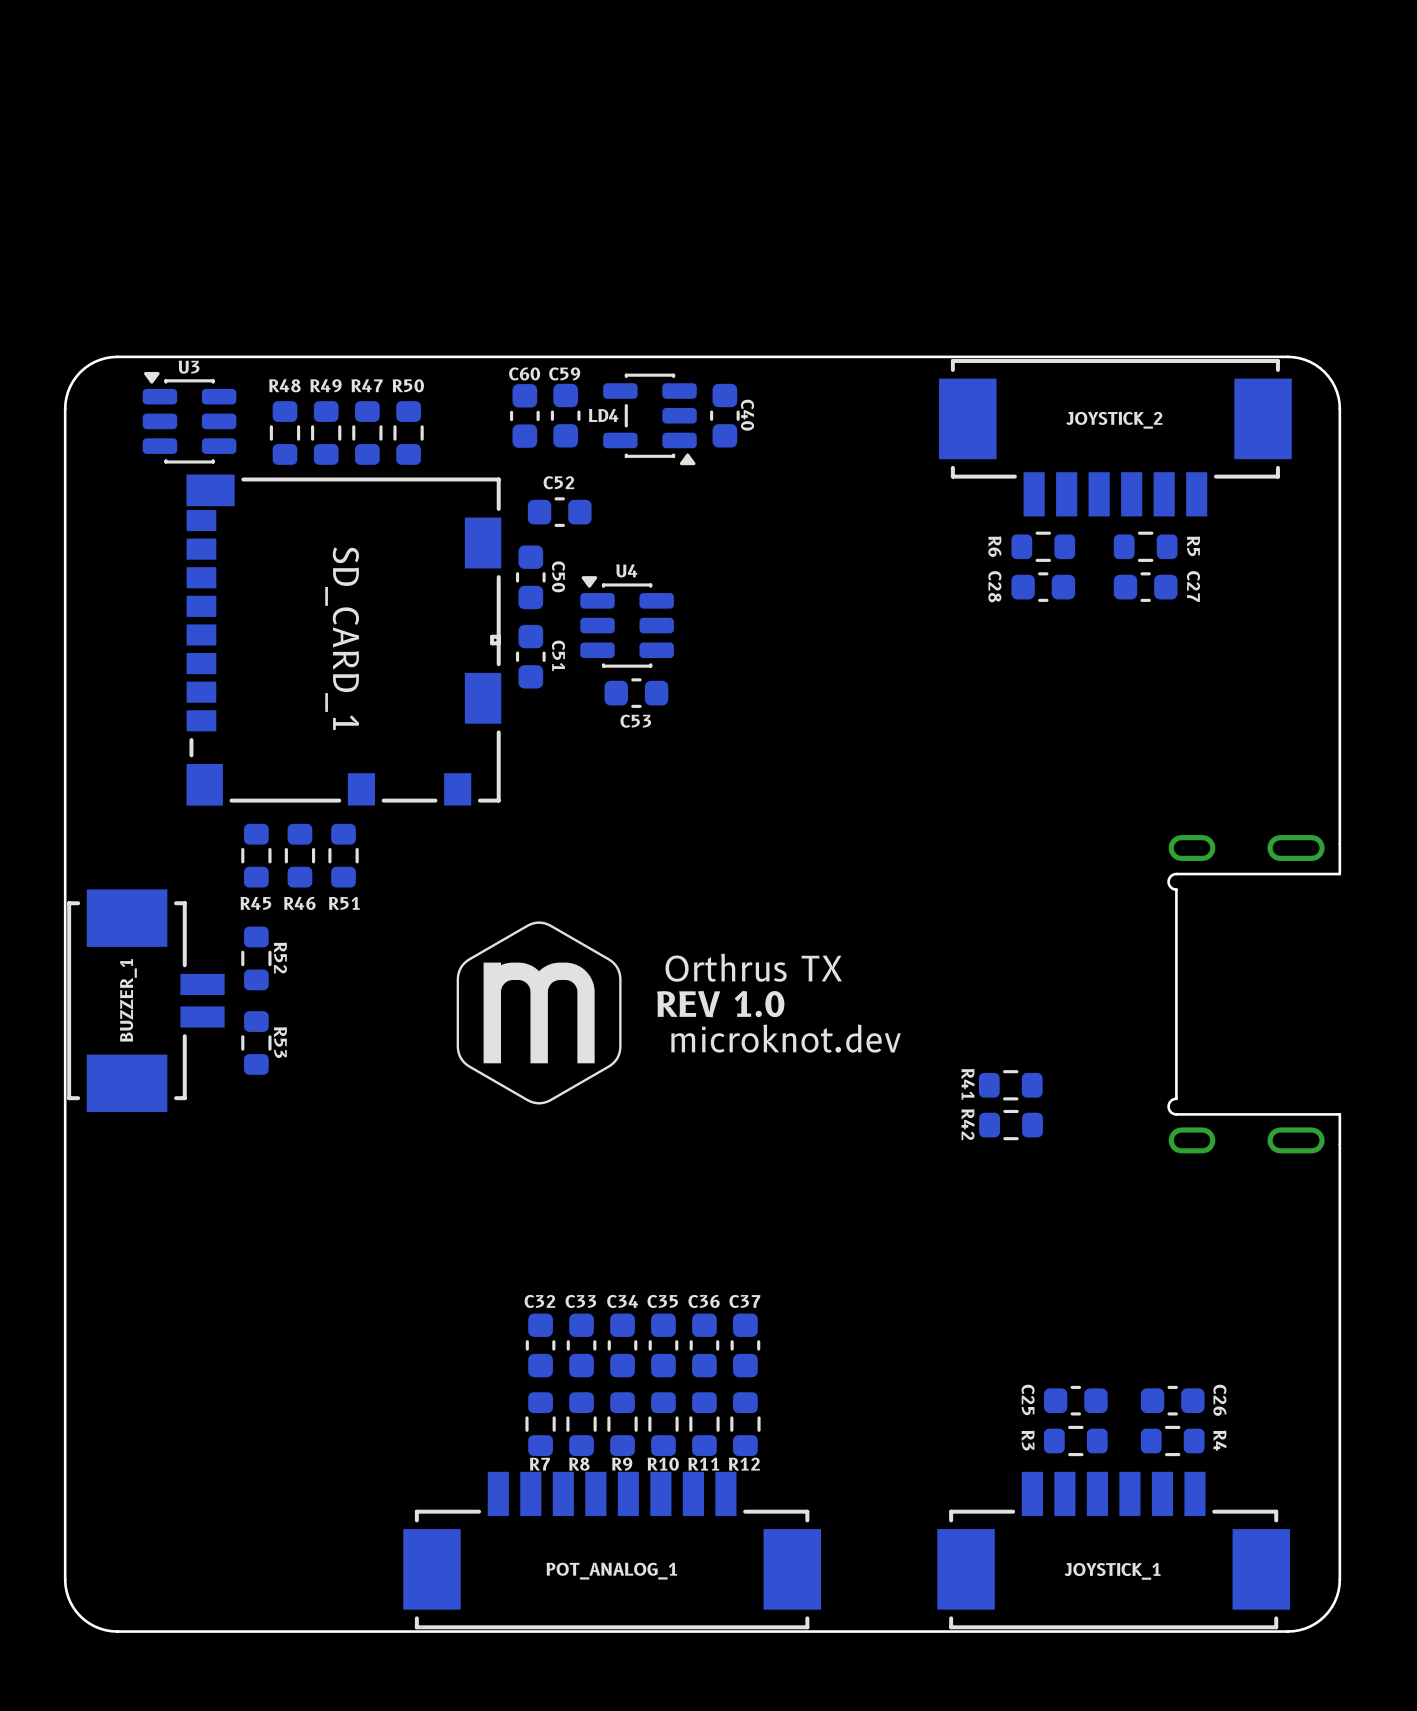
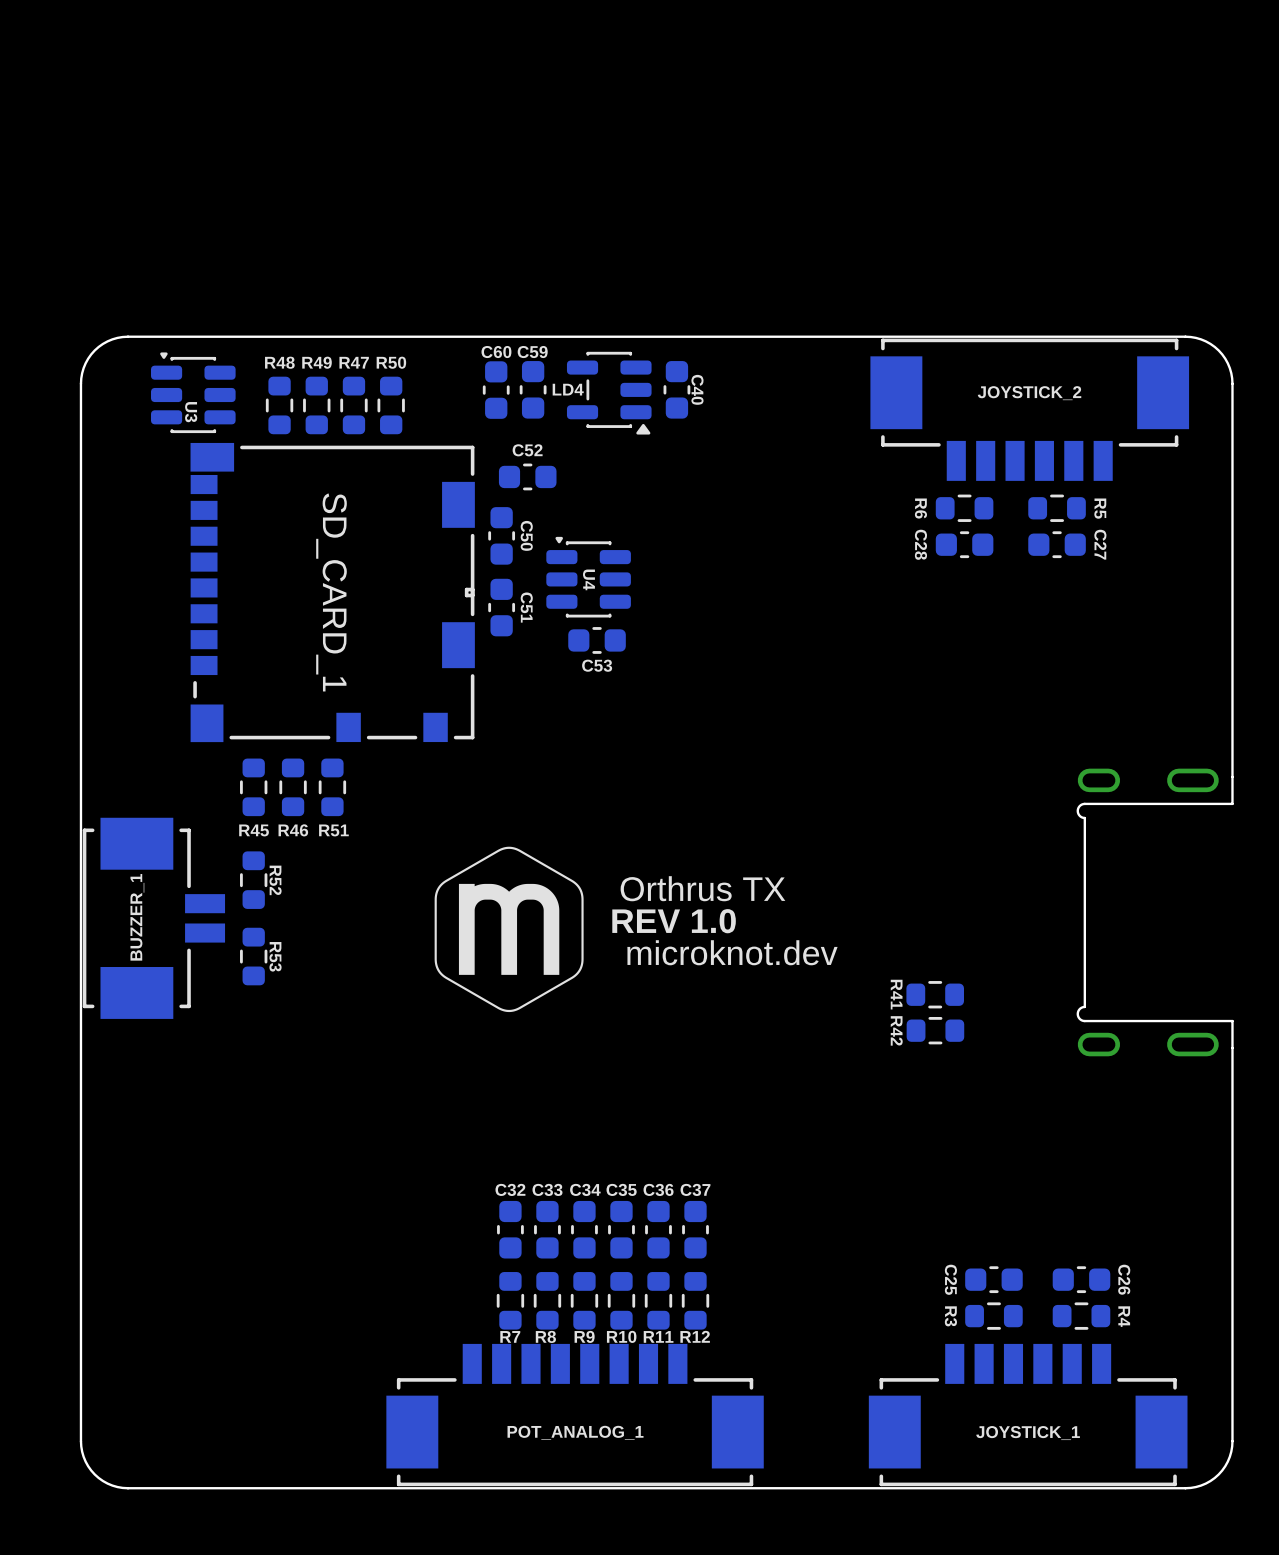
U3 name rotation: 0° (189, 367) -> 90° clockwise (191, 412)
U3 name position: U3 (189, 367) -> U3 (191, 412)
U3 footprint: [142, 371, 237, 464] -> [151, 352, 236, 434]
U4 name rotation: 0° (626, 570) -> 90° clockwise (588, 579)
U4 name position: U4 (626, 570) -> U4 (588, 579)
U4 footprint: [580, 576, 674, 668] -> [546, 536, 631, 618]

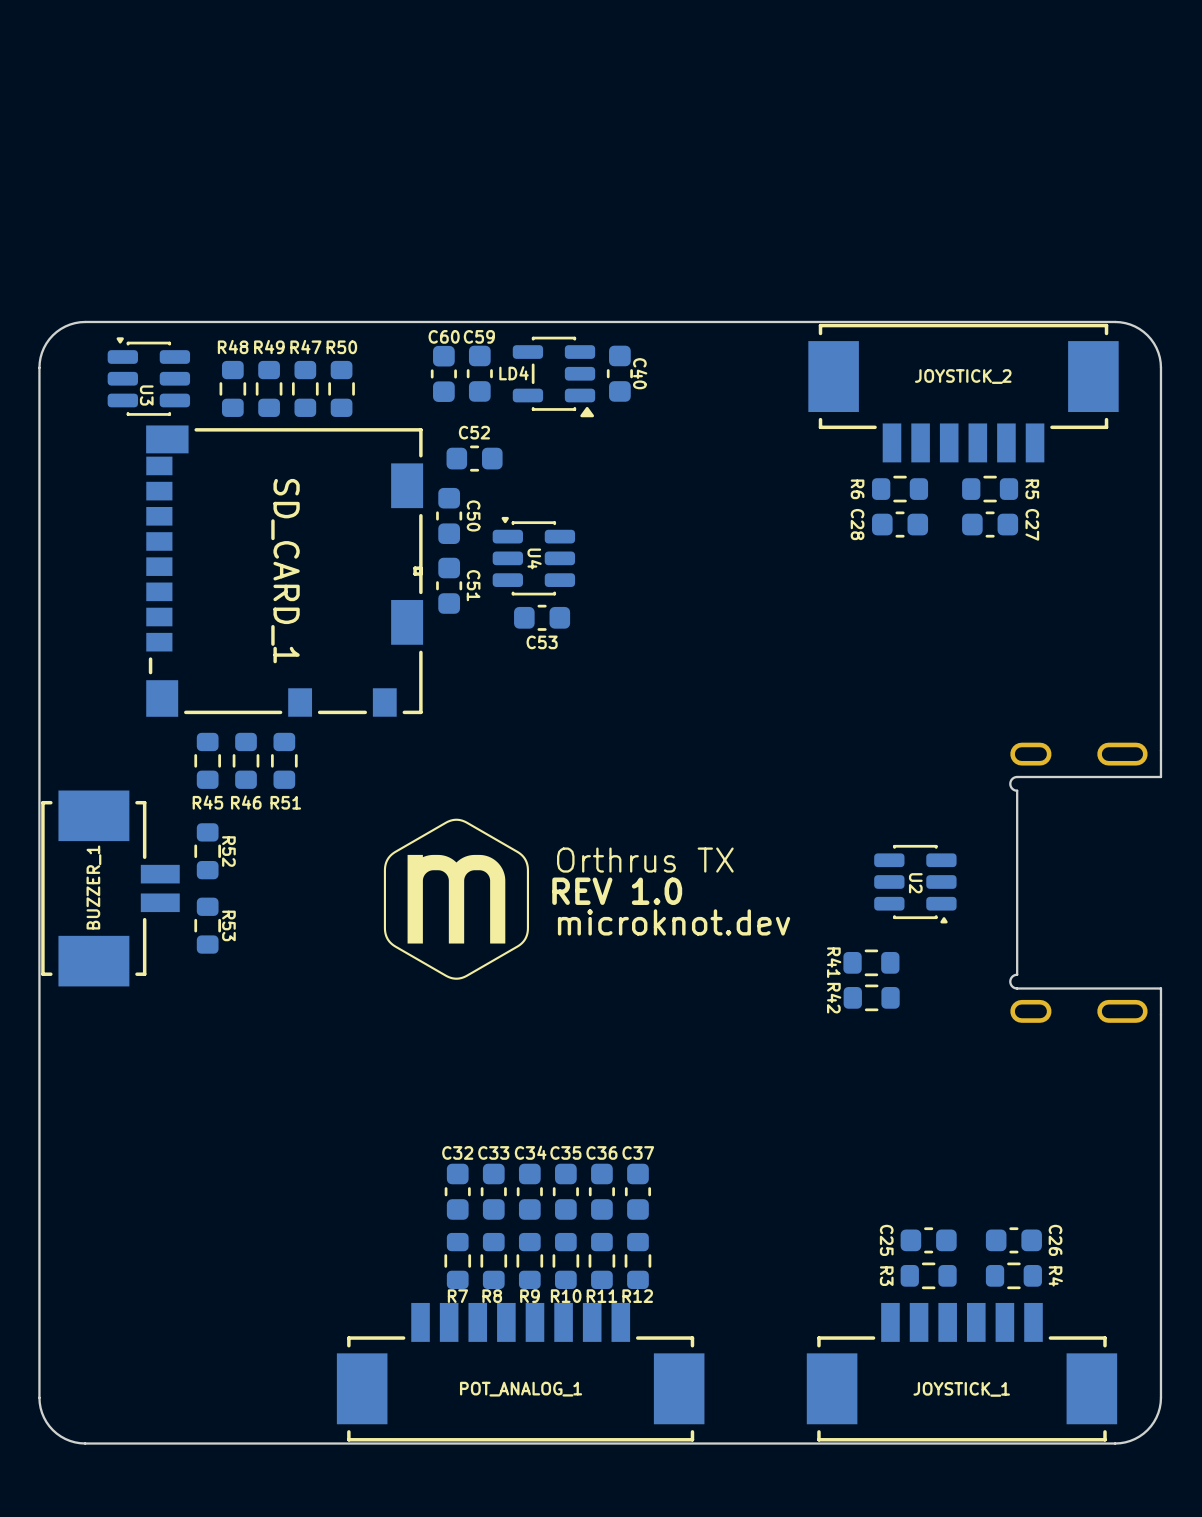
U2: none -> (915, 884)

